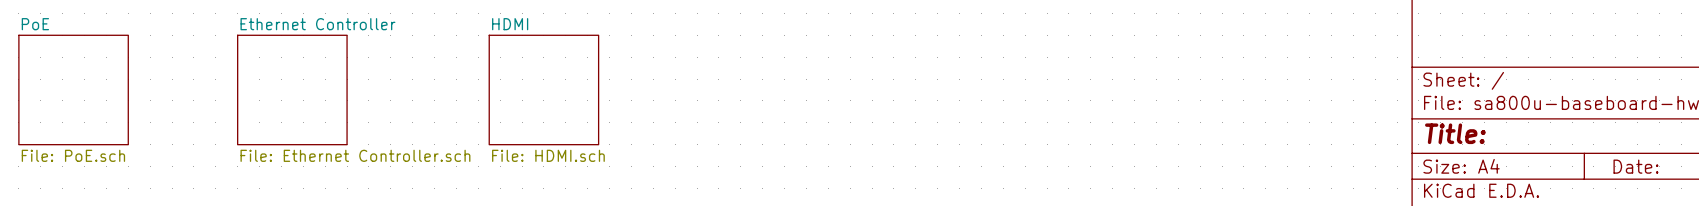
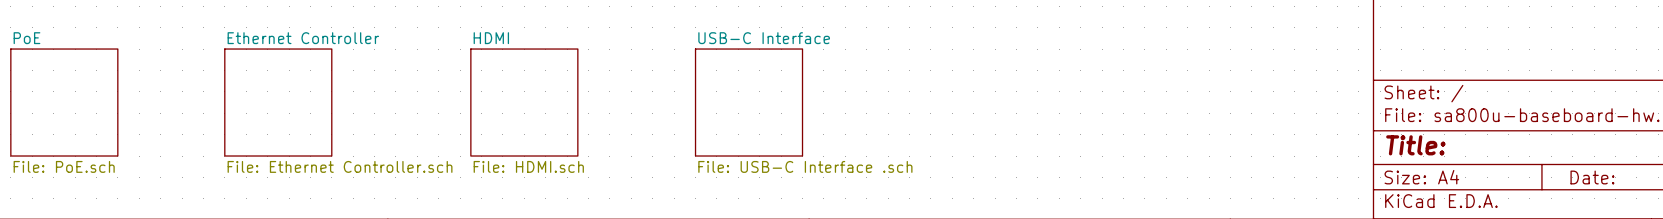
sheet USB-C Interface: none -> File: USB-C Interface .sch (749, 102)

